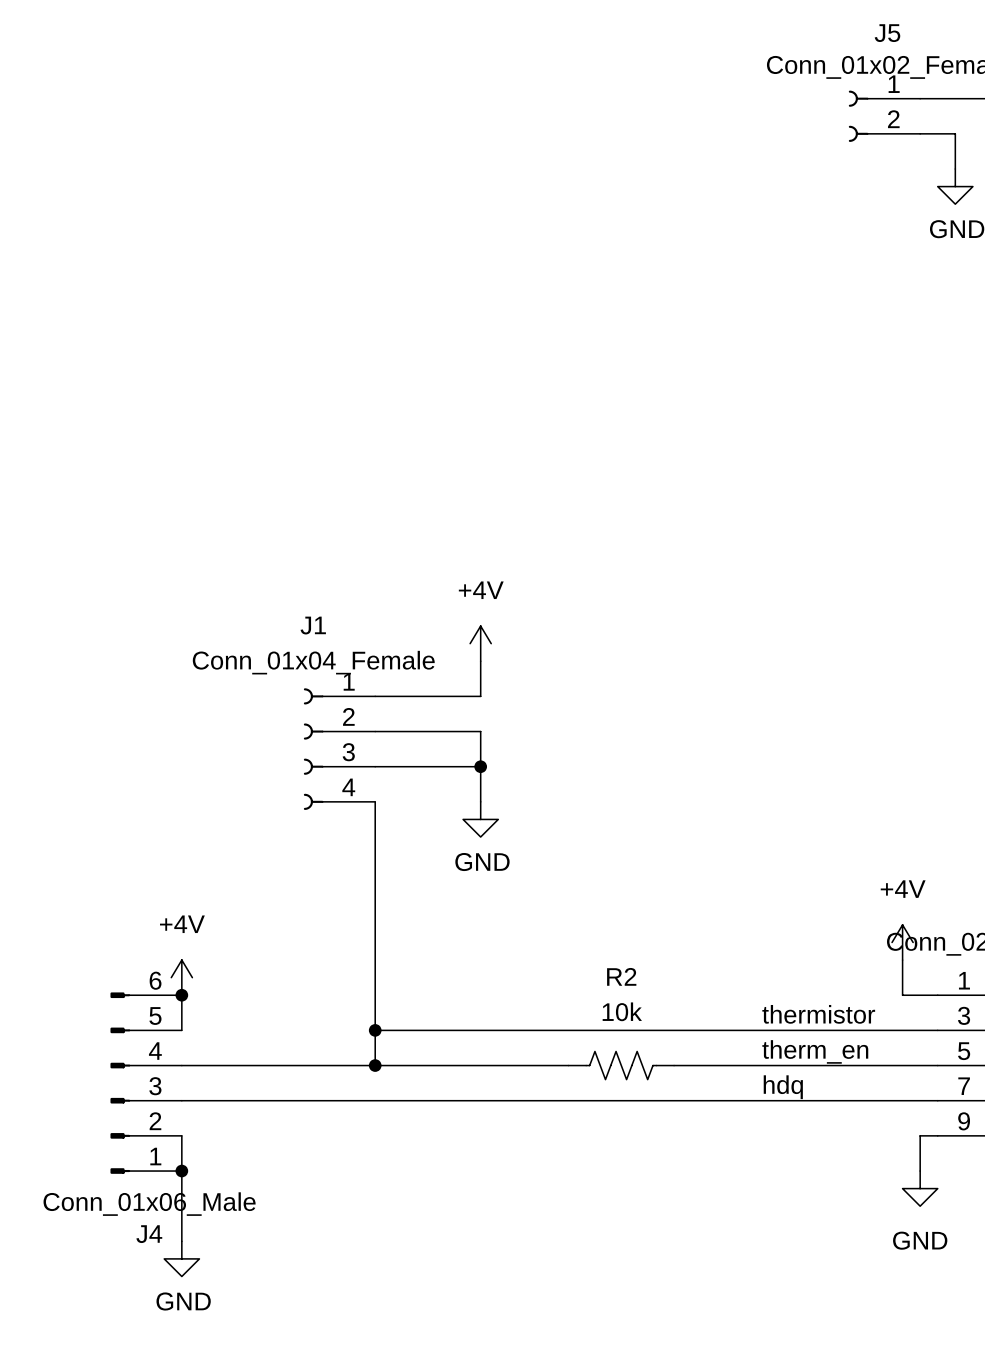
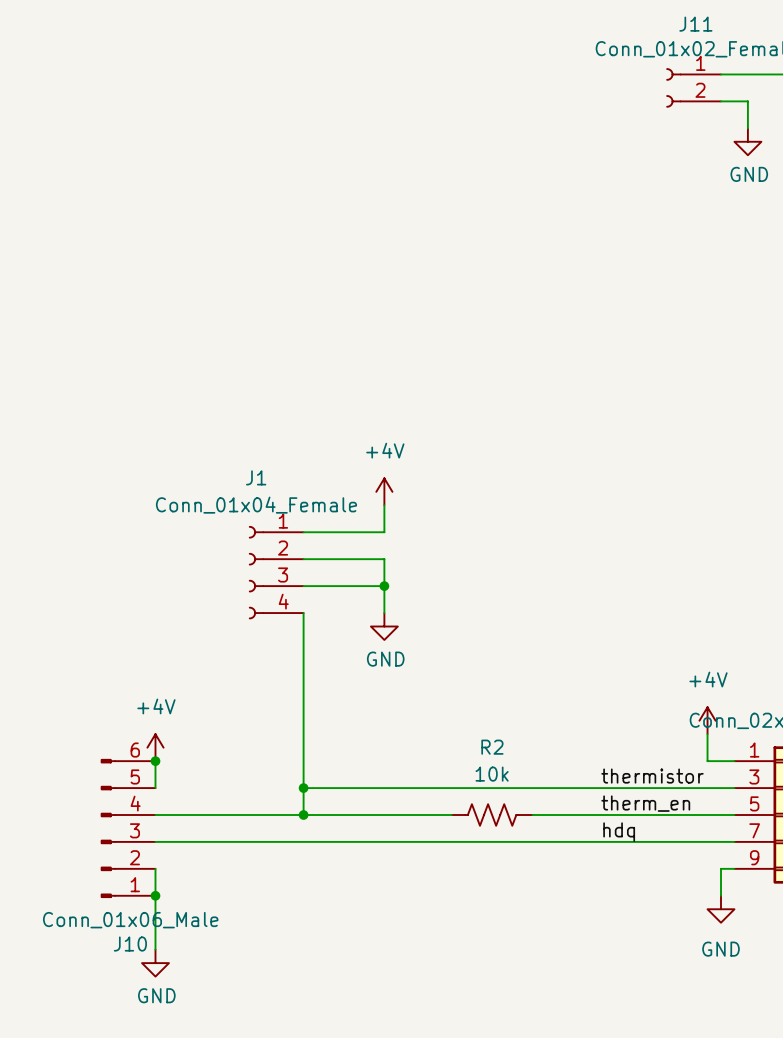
J5 name: J5 (887, 33) -> J11 (695, 24)
J4 name: J4 (149, 1234) -> J10 (130, 944)

